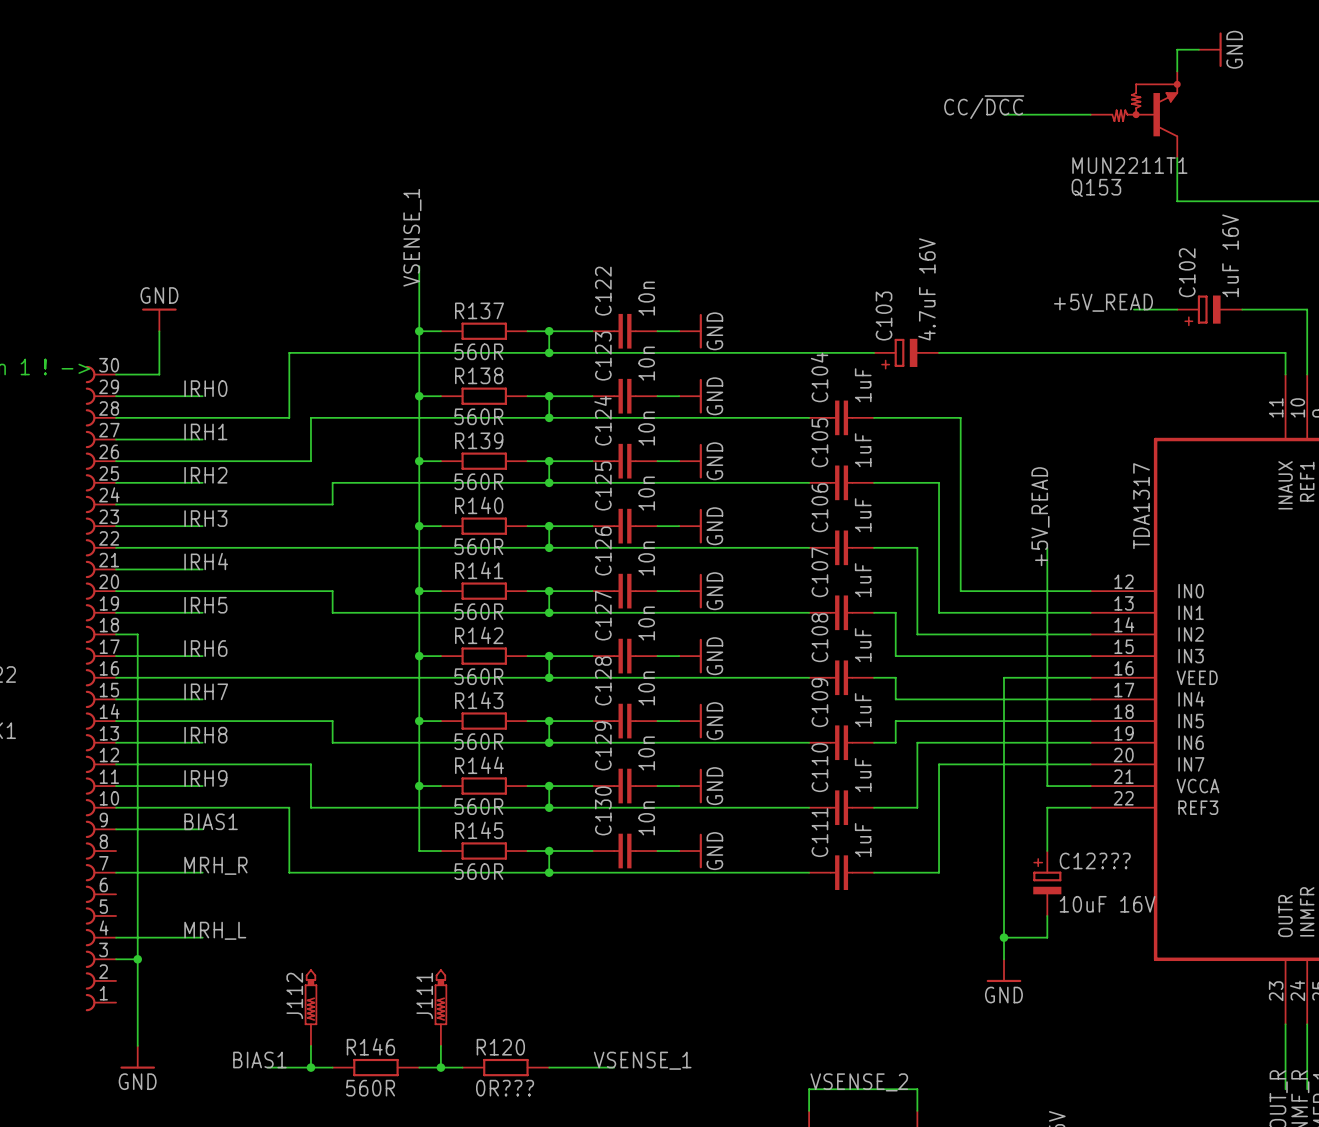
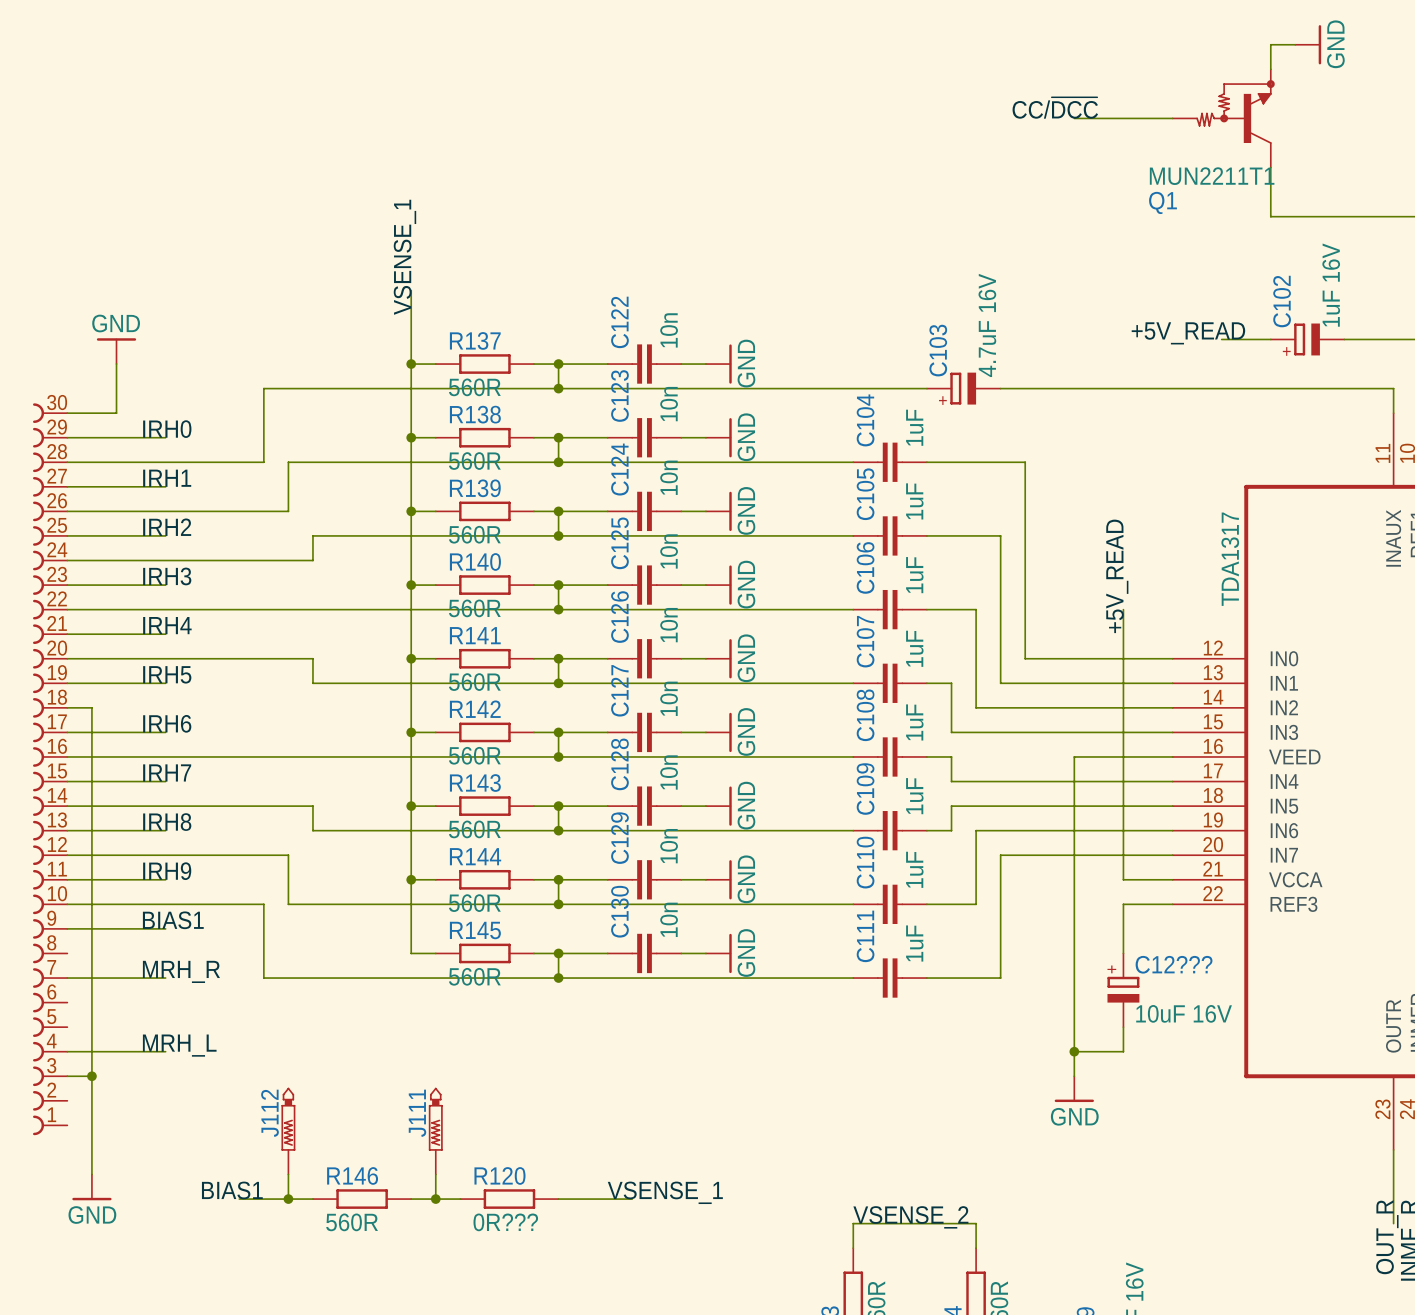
Q153 name: Q153 (1096, 187) -> Q1 (1162, 202)

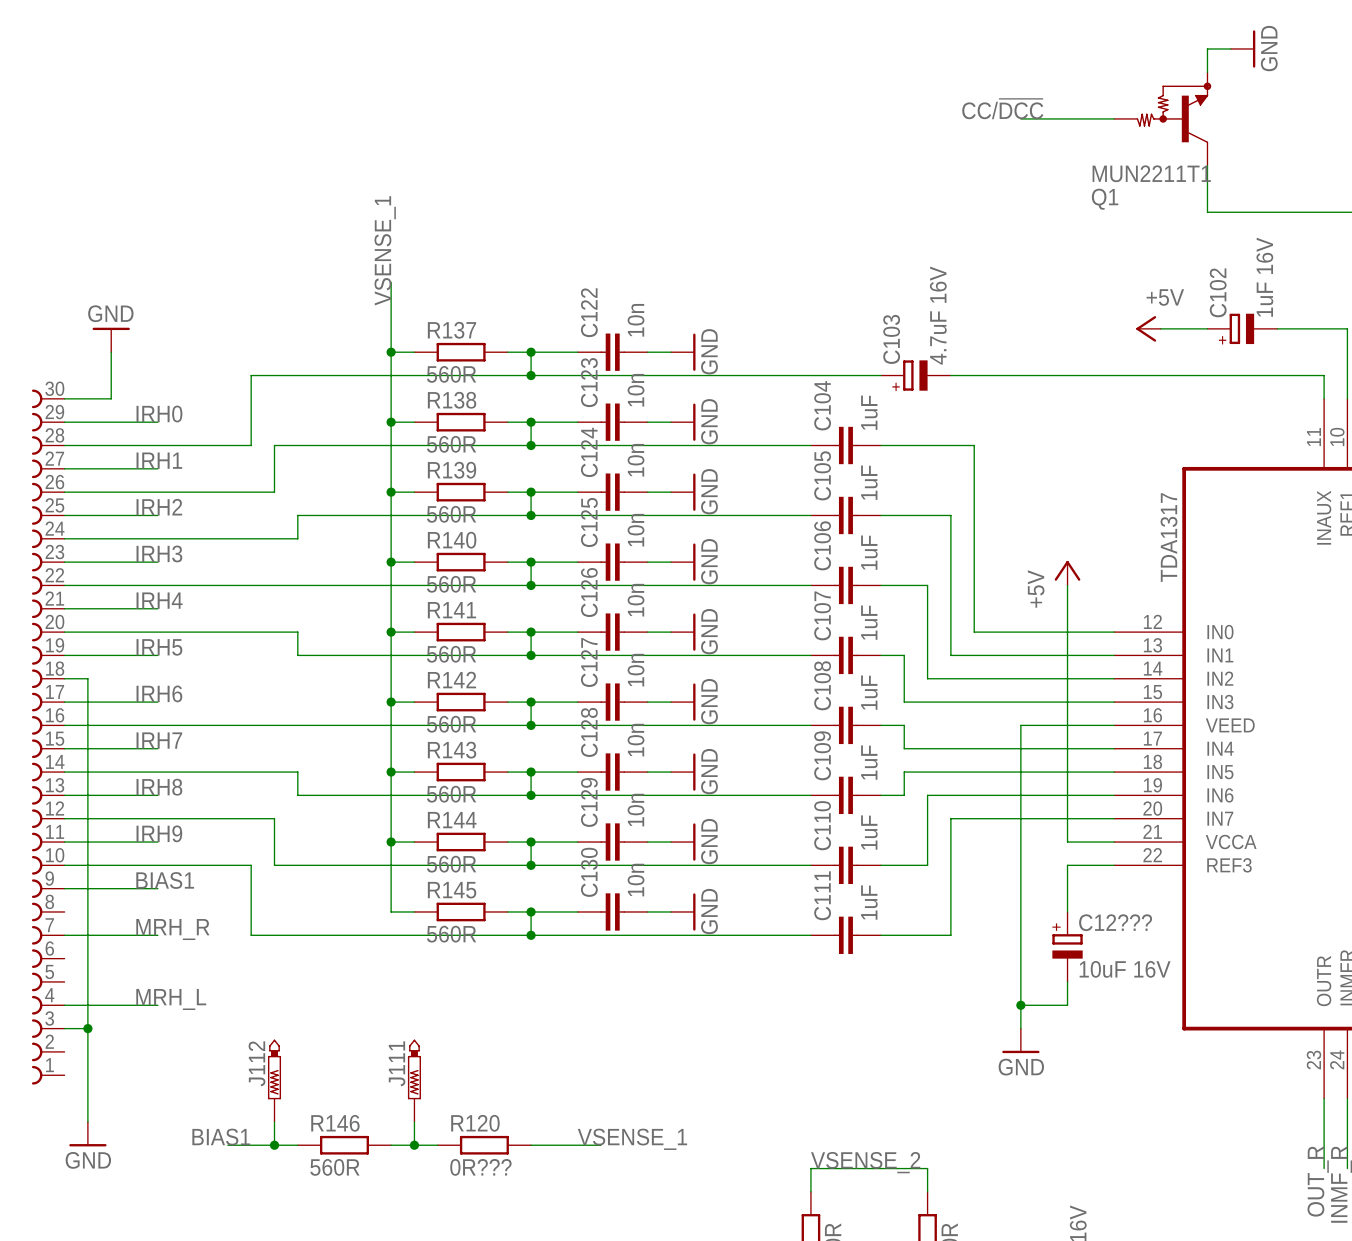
label: +5V_READ (1188, 333) -> none
power symbol: none -> +5V (1148, 328)
label: +5V_READ (1117, 576) -> none
power symbol: none -> +5V (1067, 573)

